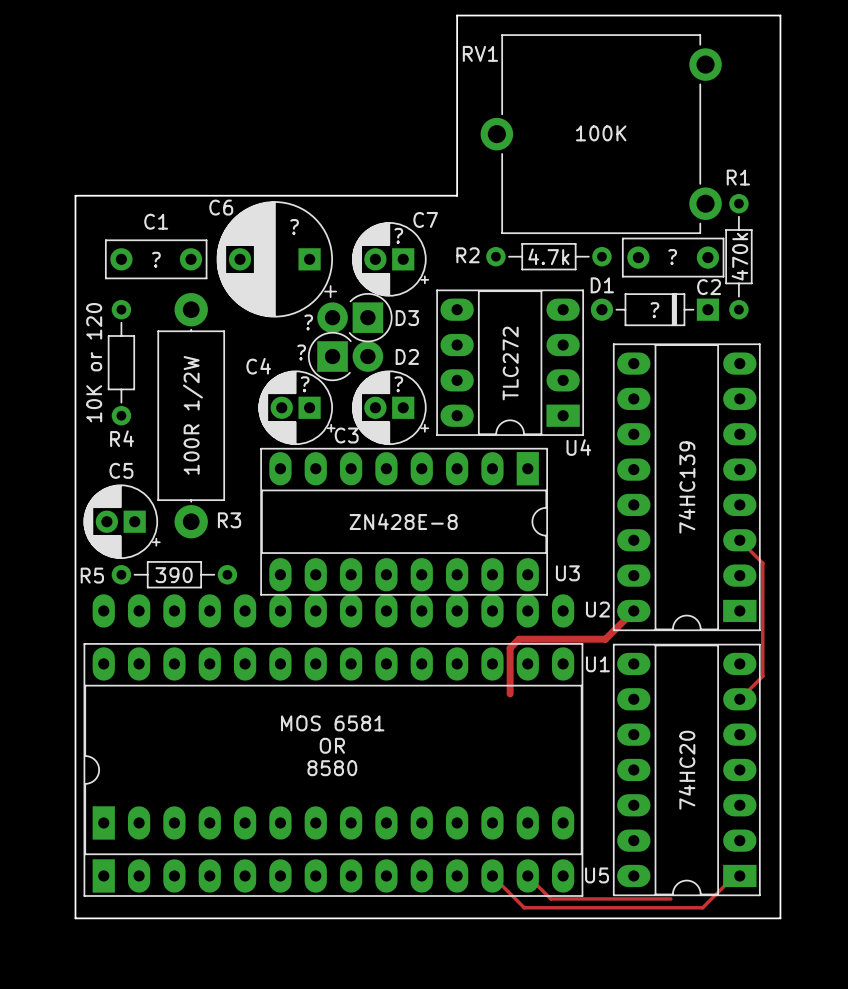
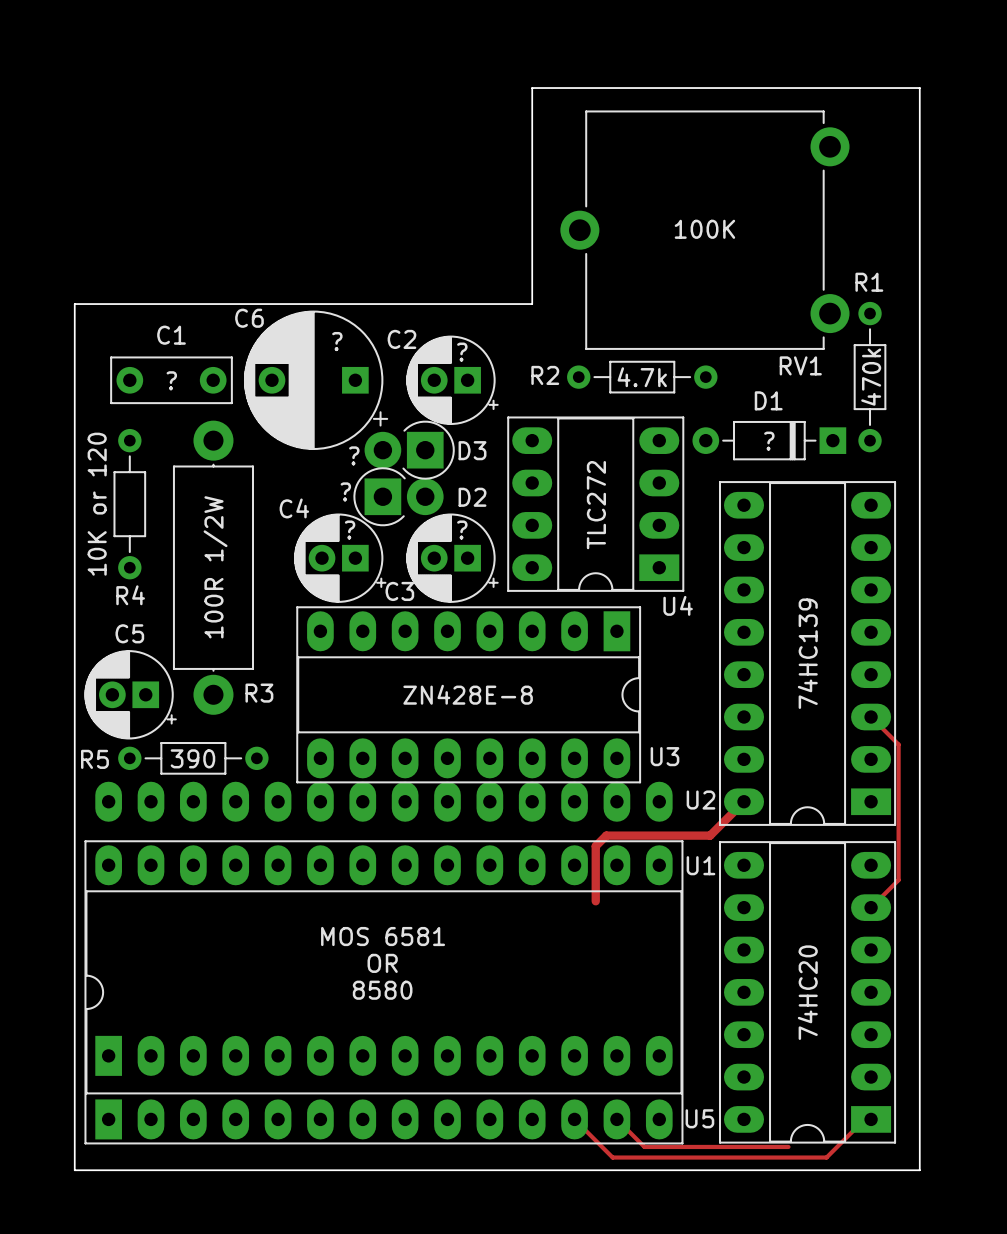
RV1 name position: RV1 (480, 53) -> RV1 (800, 365)
C7 name: C7 (425, 219) -> C2 (401, 339)
text: ? (672, 257) -> none
C2: (673, 257) -> none
D1 name position: D1 (602, 285) -> D1 (768, 400)

